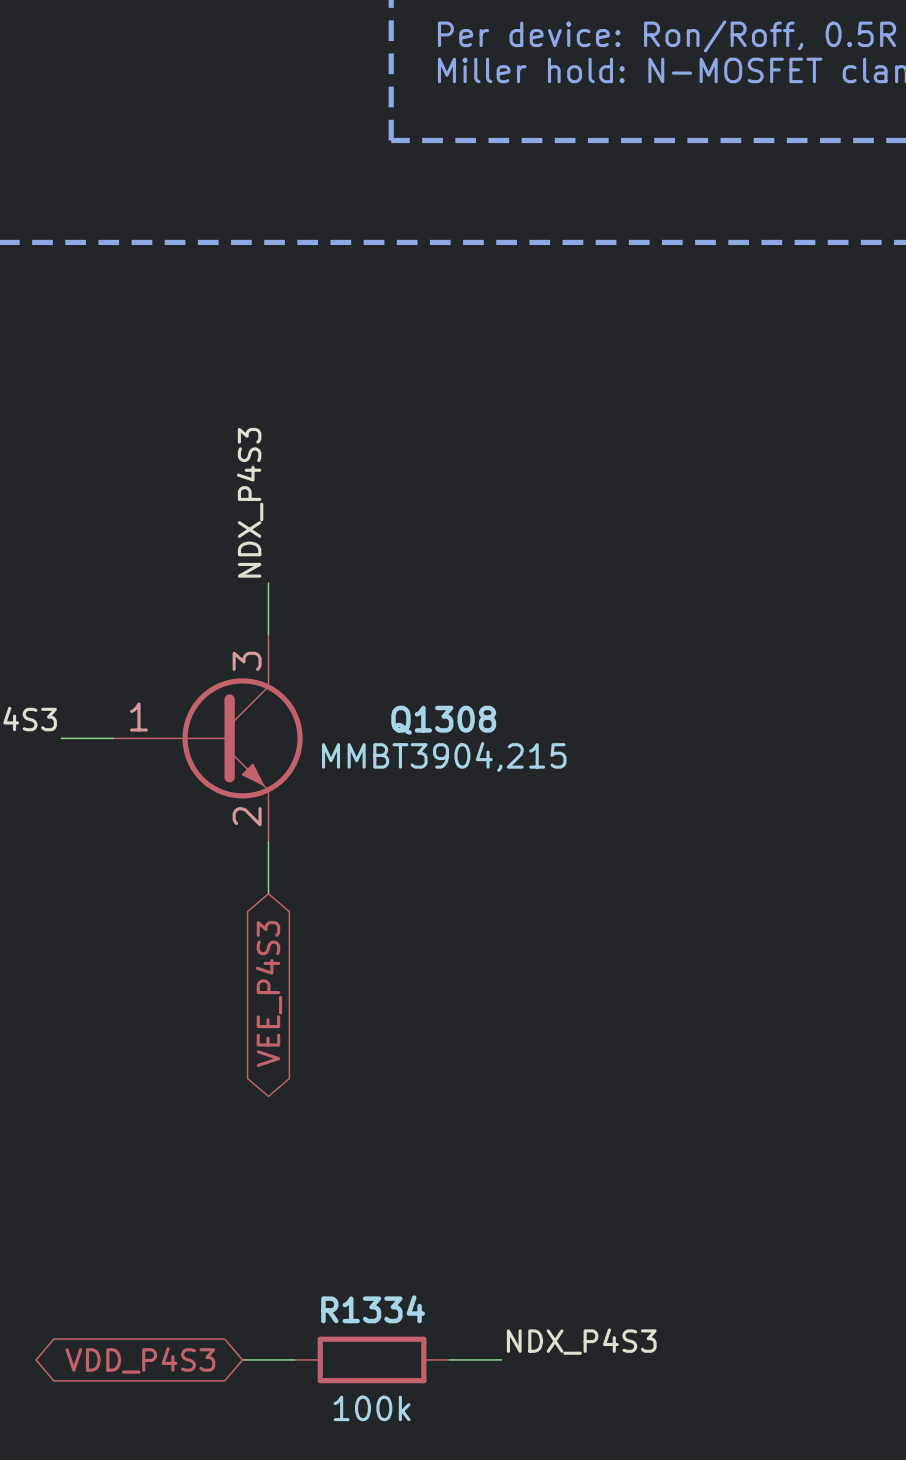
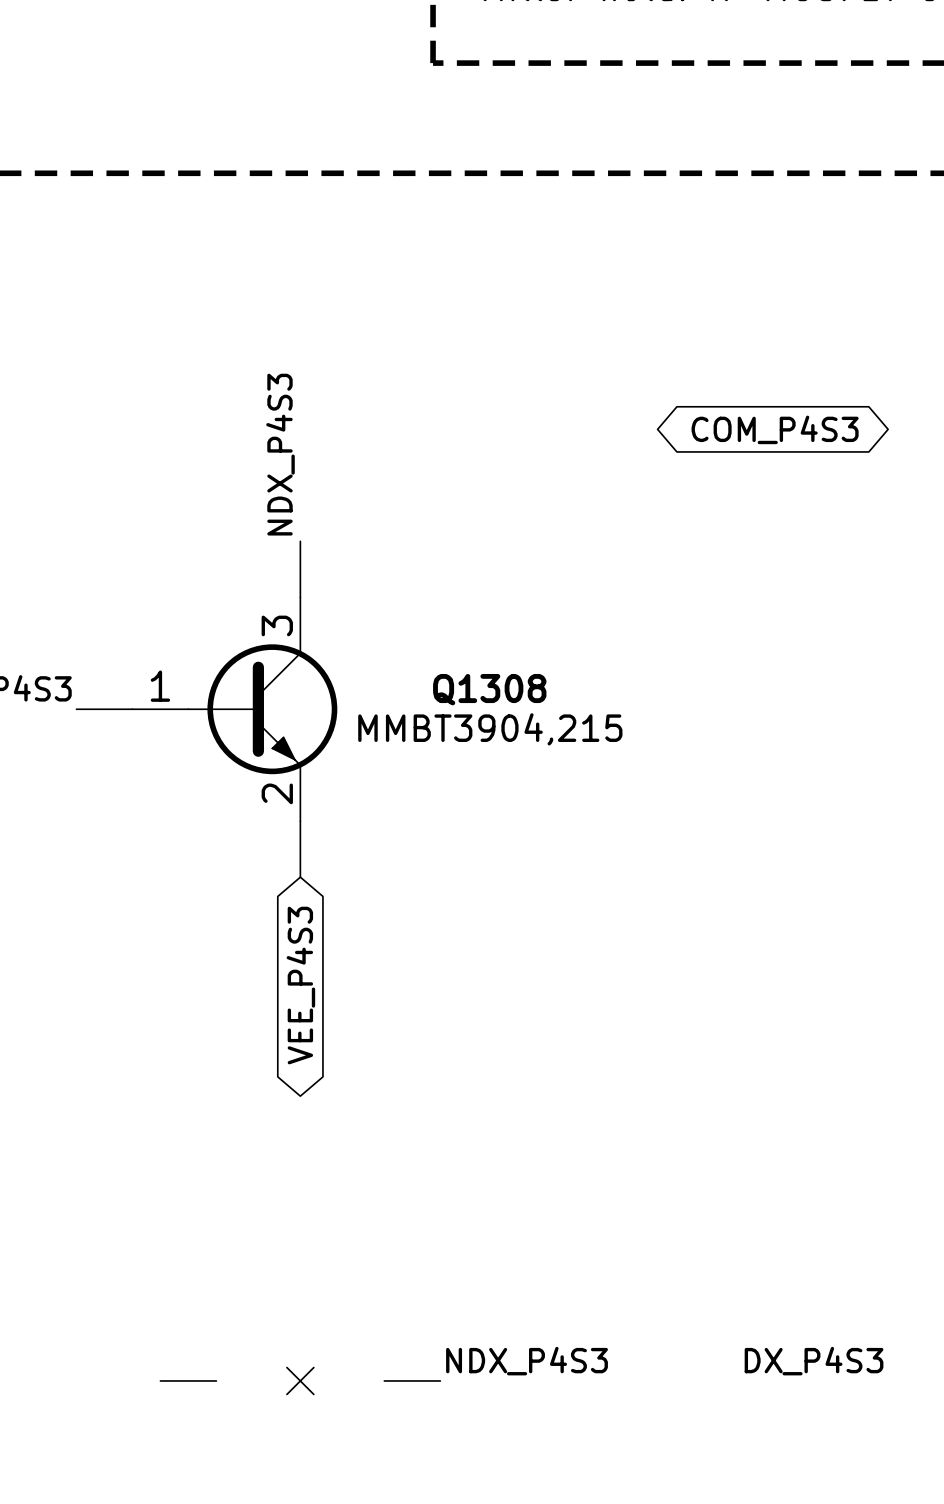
global label: none -> COM_P4S3 (775, 429)
label position: NDX_P4S3 (581, 1341) -> NDX_P4S3 (527, 1361)
label: none -> DX_P4S3 (814, 1361)
wire: (242, 1359) (294, 1359) -> (160, 1380) (216, 1380)
no-connect mark: none -> (300, 1380)
R1334: 100k (372, 1359) -> none
wire: (449, 1359) (501, 1359) -> (384, 1380) (440, 1380)
global label: VDD_P4S3 (140, 1360) -> none

